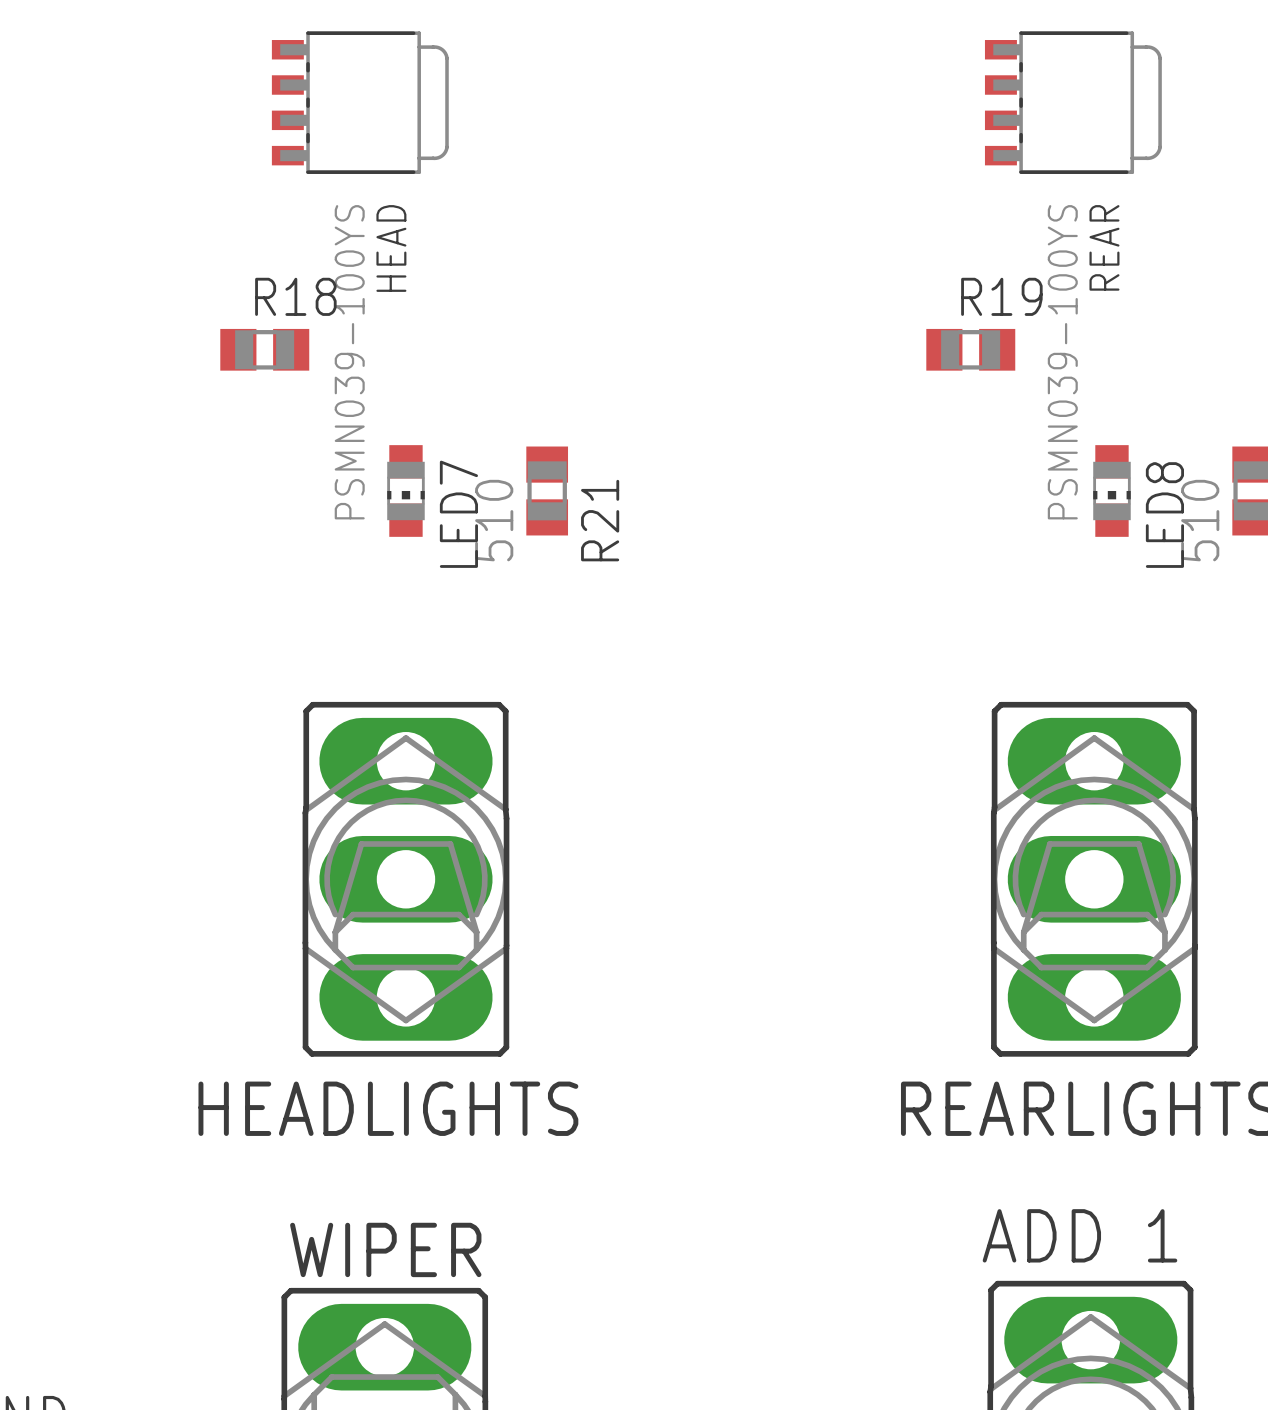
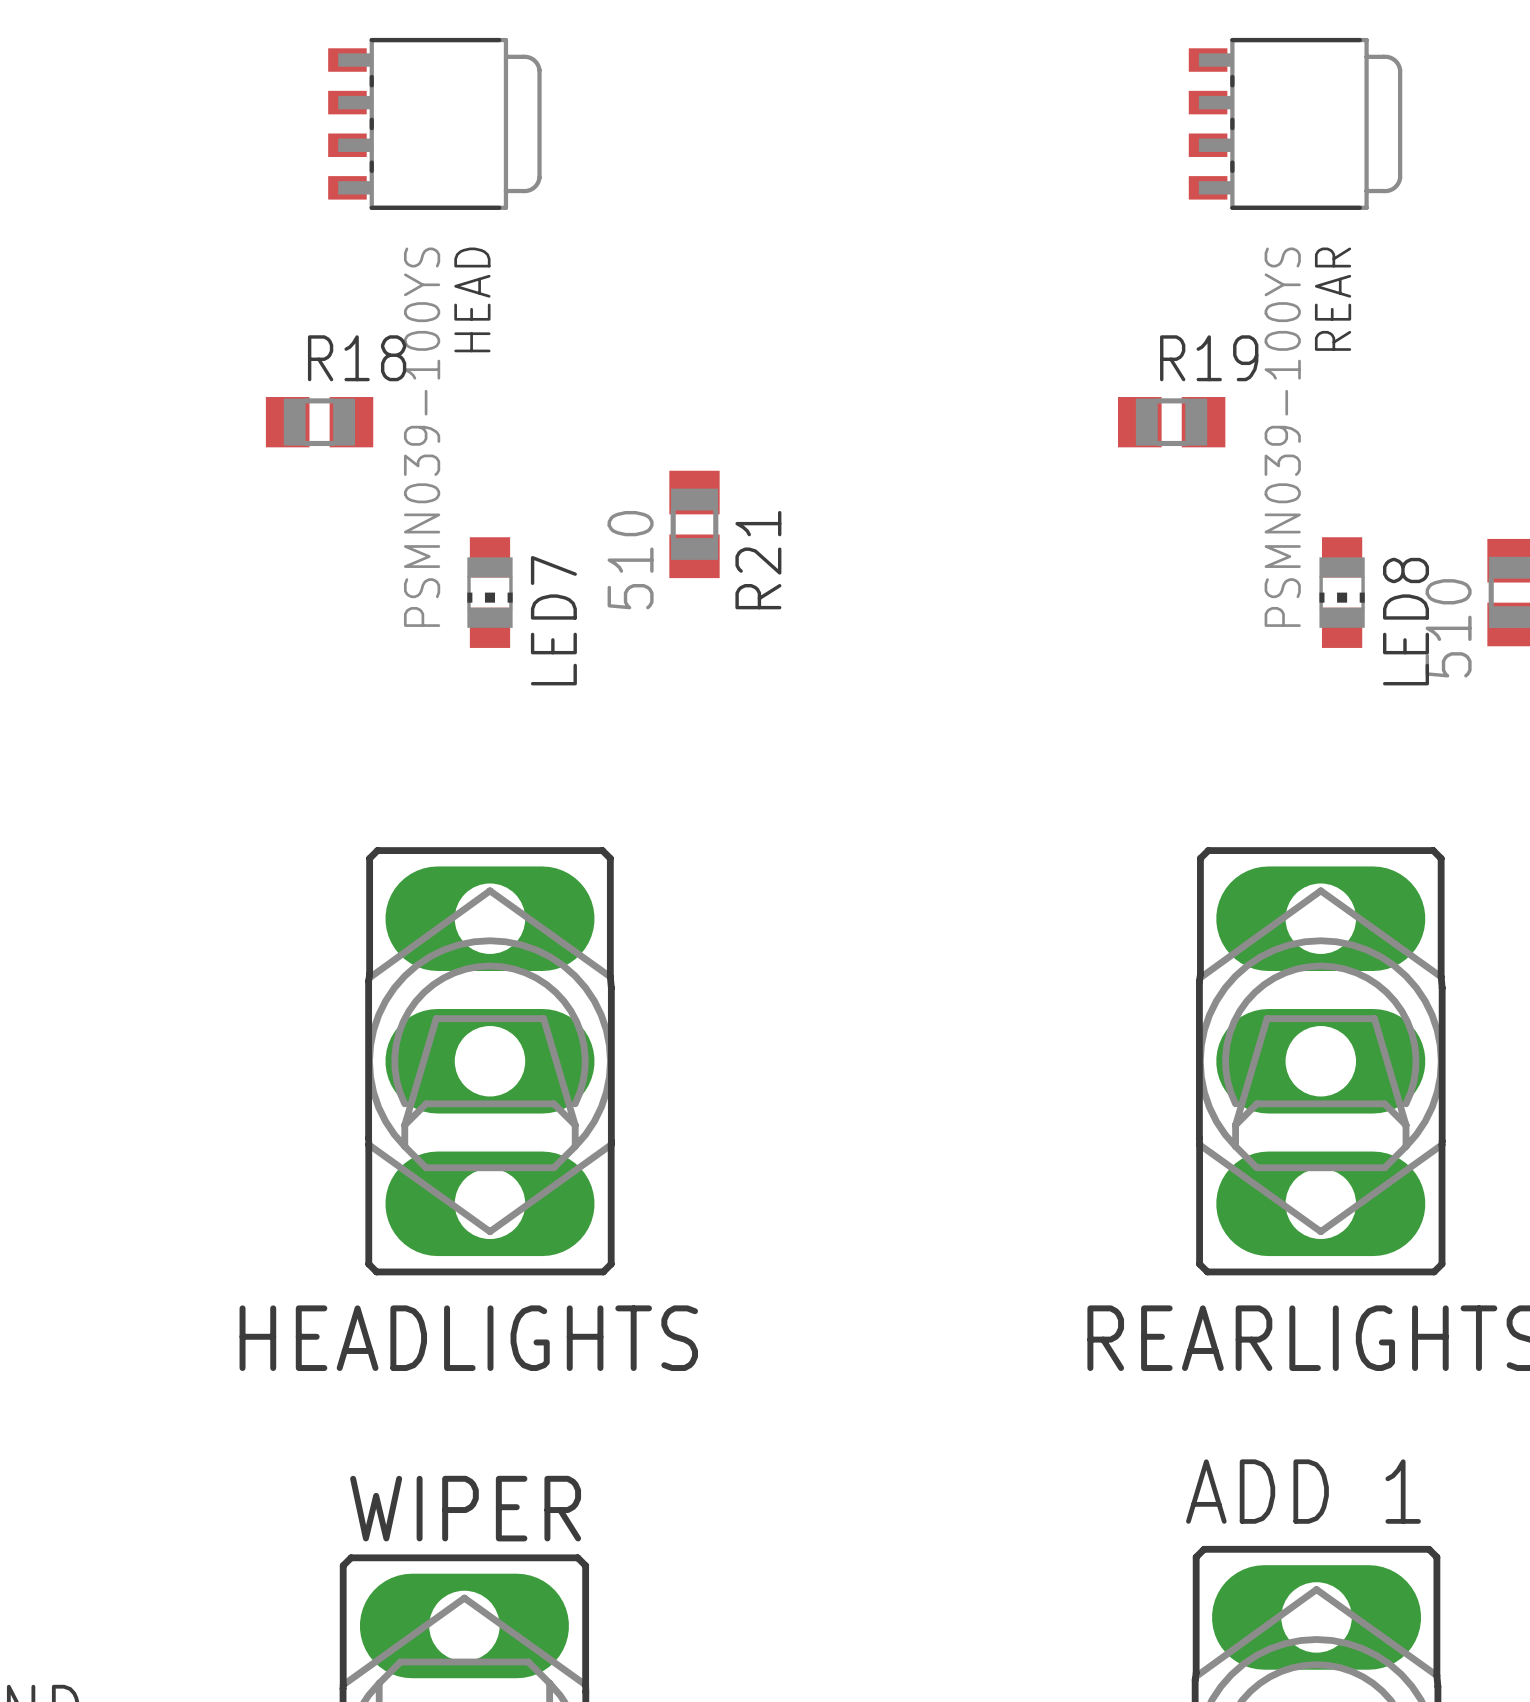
R21 position: (547, 490) -> (694, 524)

